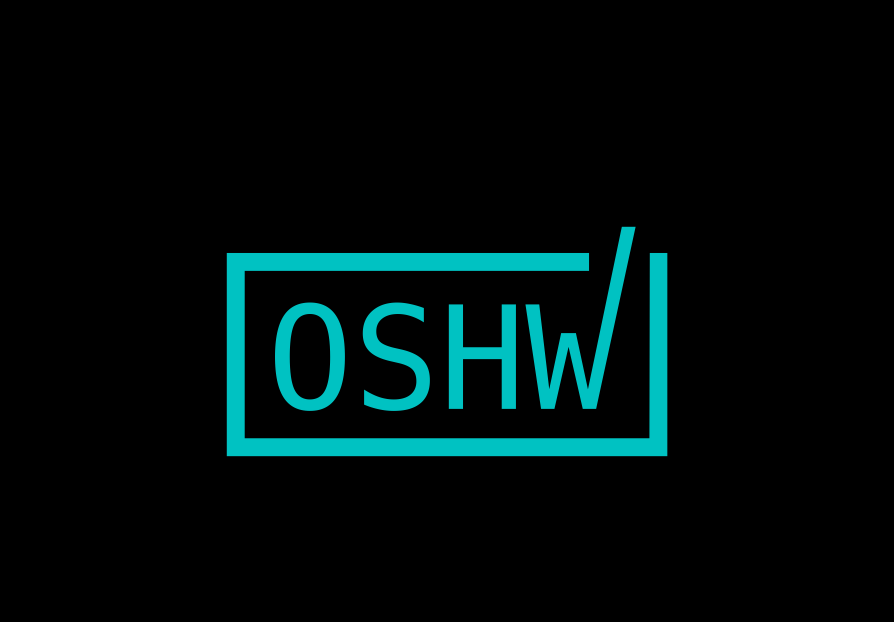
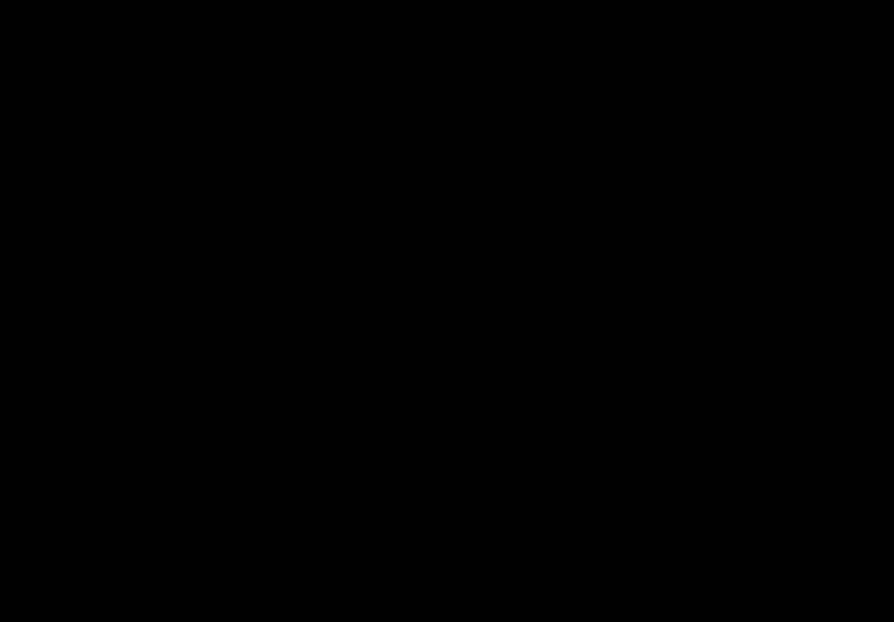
drawing: [226, 226, 668, 457] -> none

